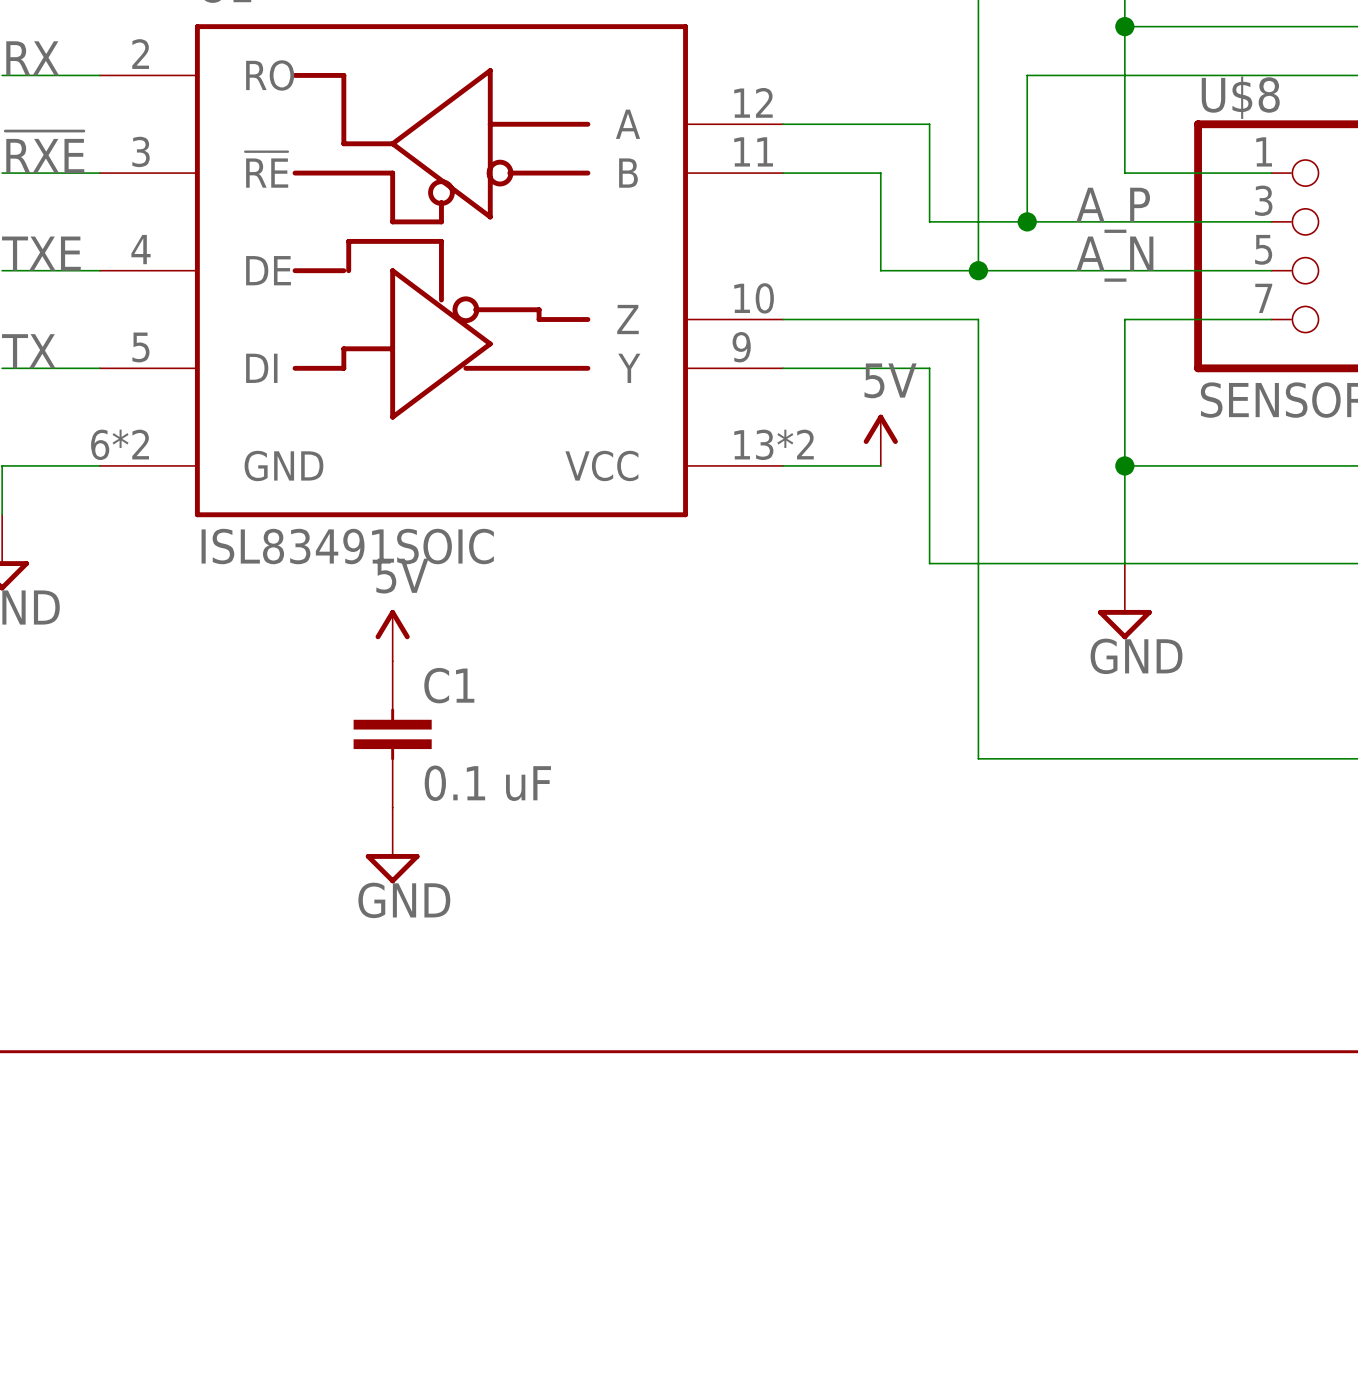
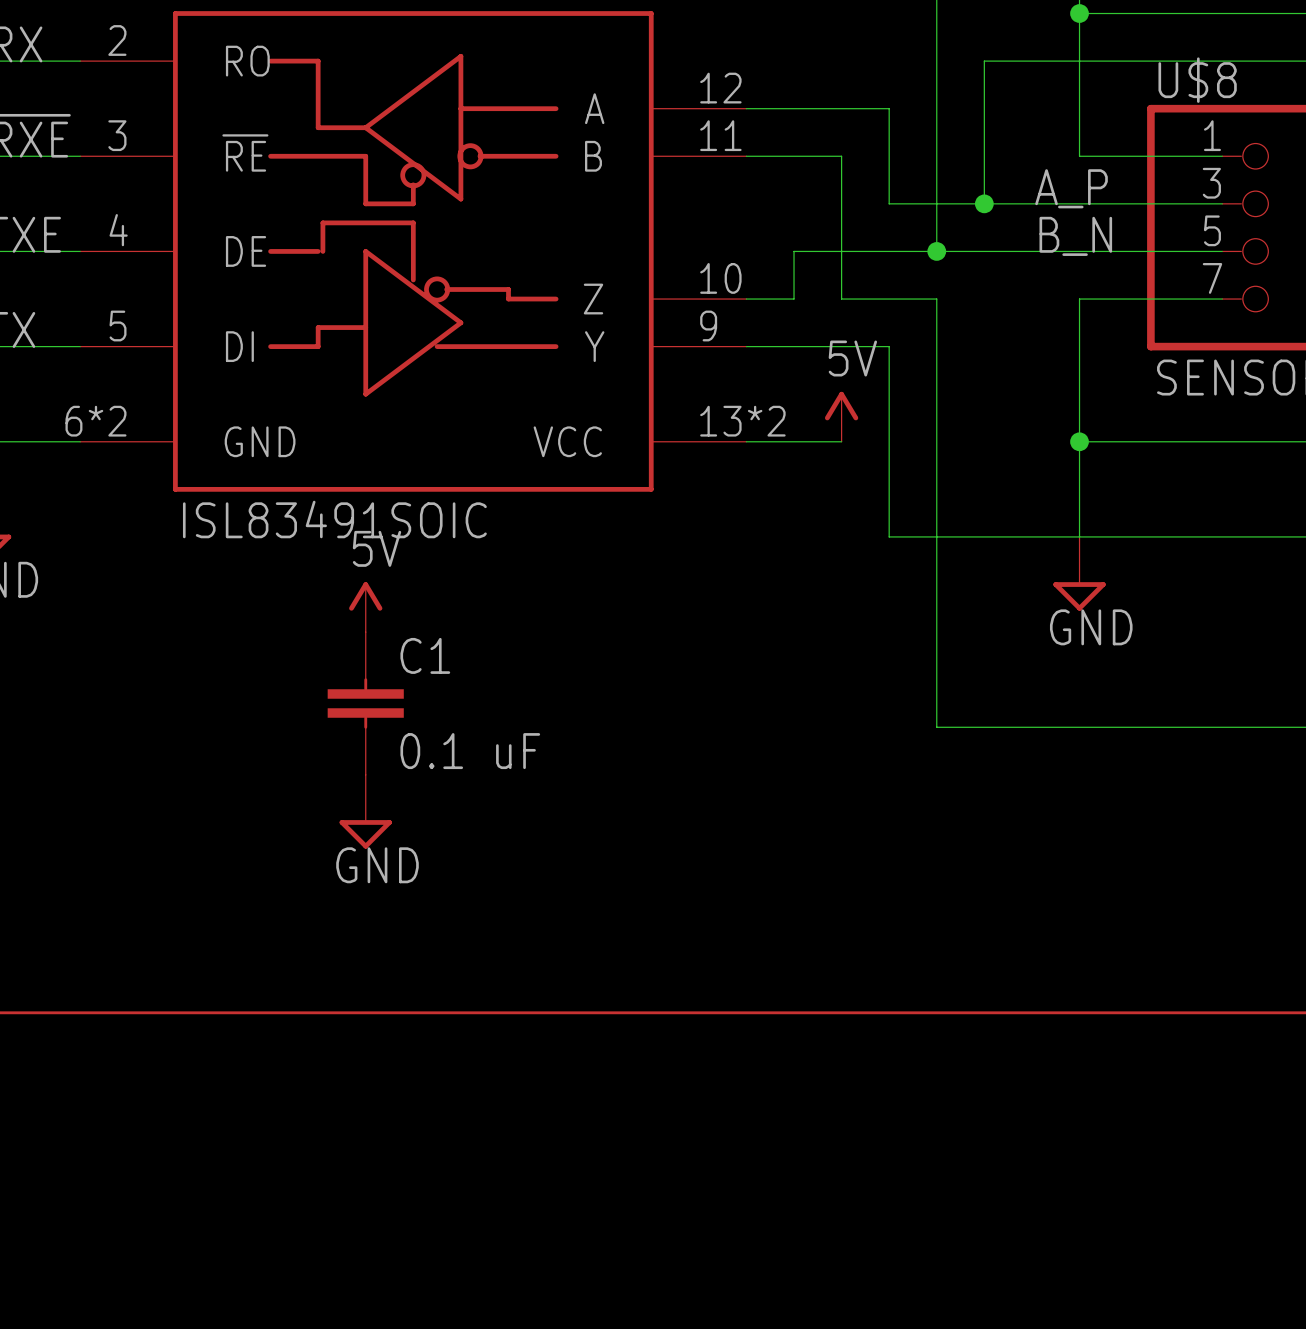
label: A_N (1114, 259) -> B_N (1075, 236)
wire: (831, 319) (880, 319) -> (794, 299) (794, 251) (841, 251) (841, 299)

